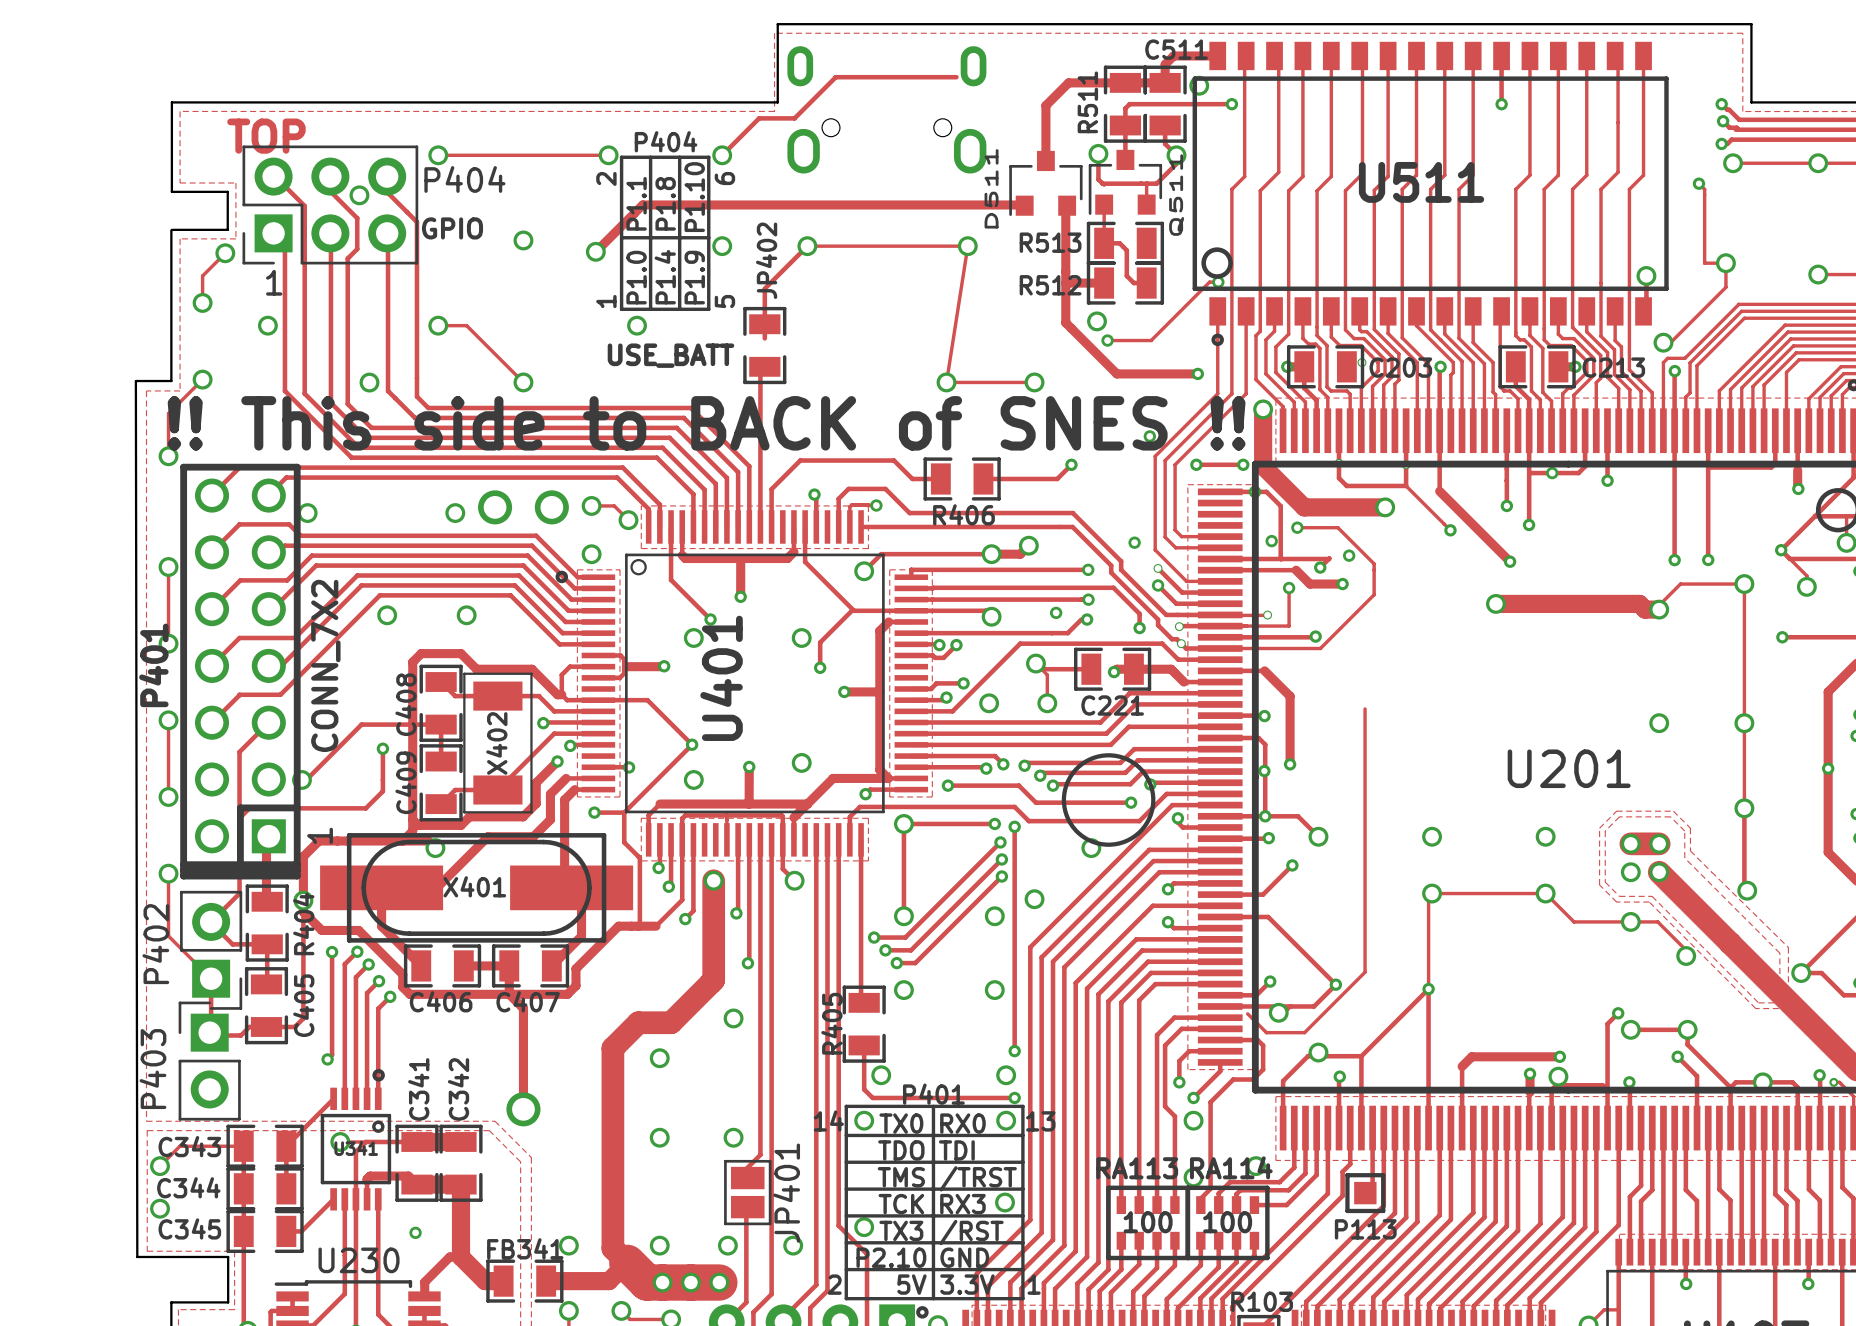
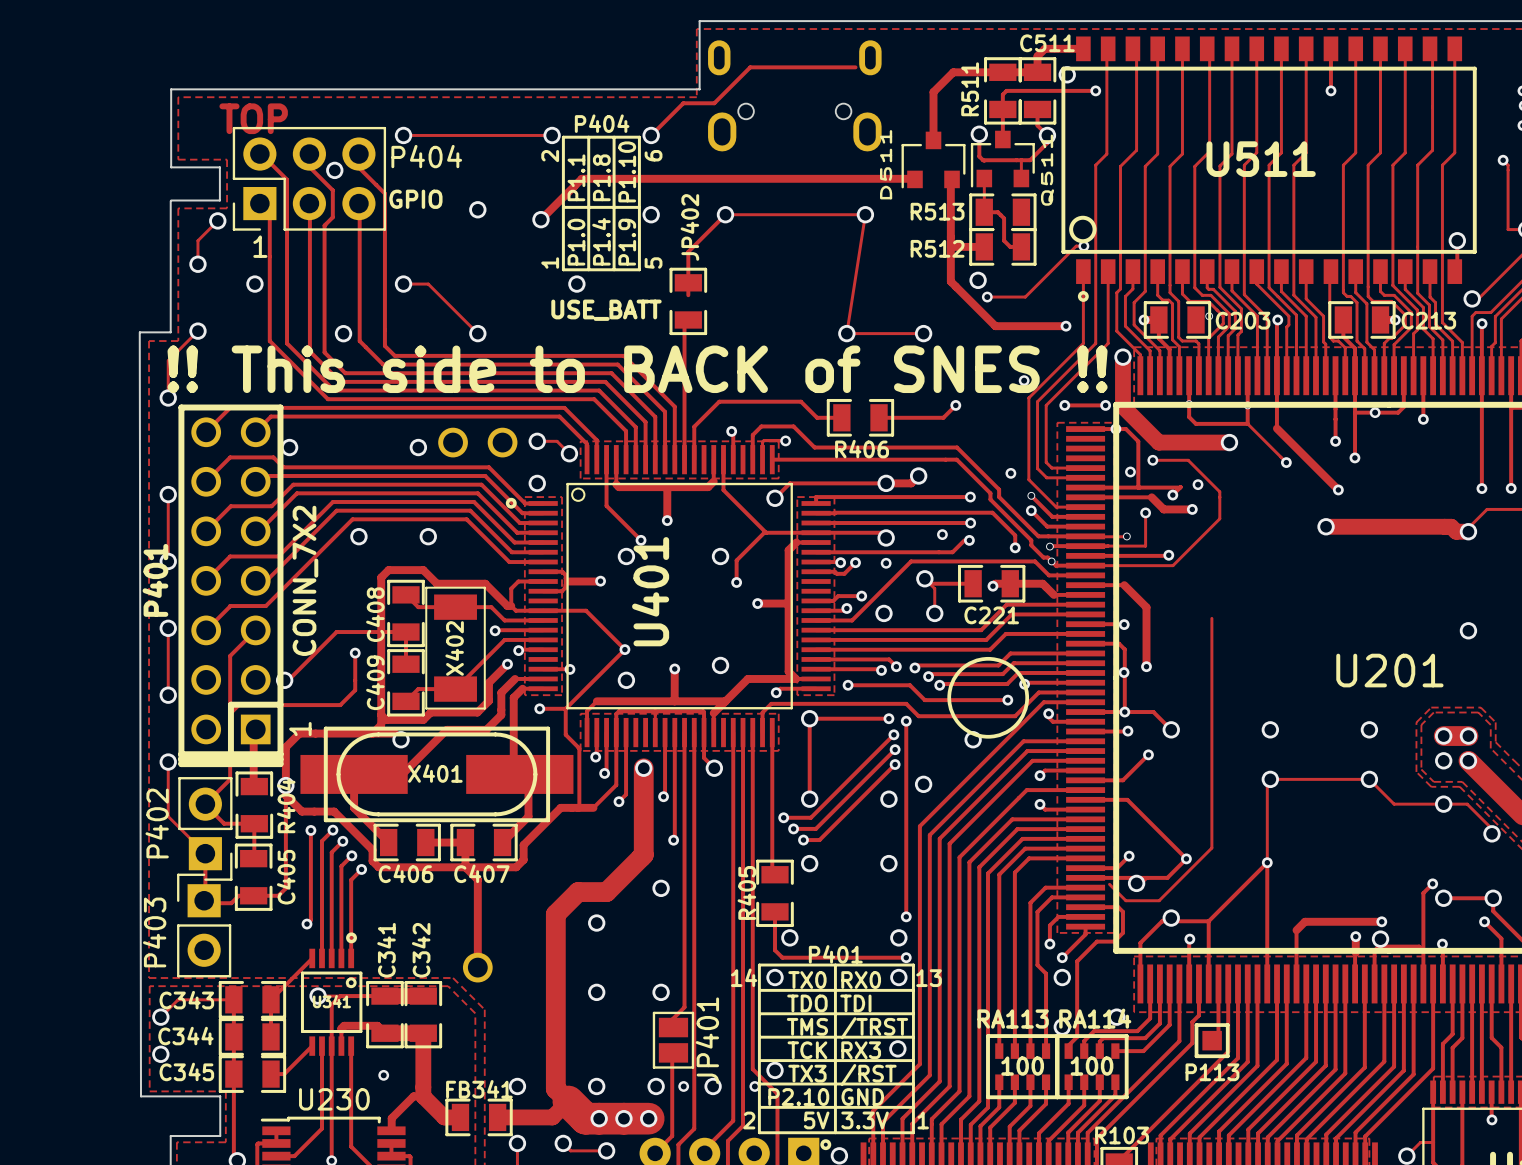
via: none -> (886, 563)
via: none -> (683, 1086)
via: none -> (754, 1086)

